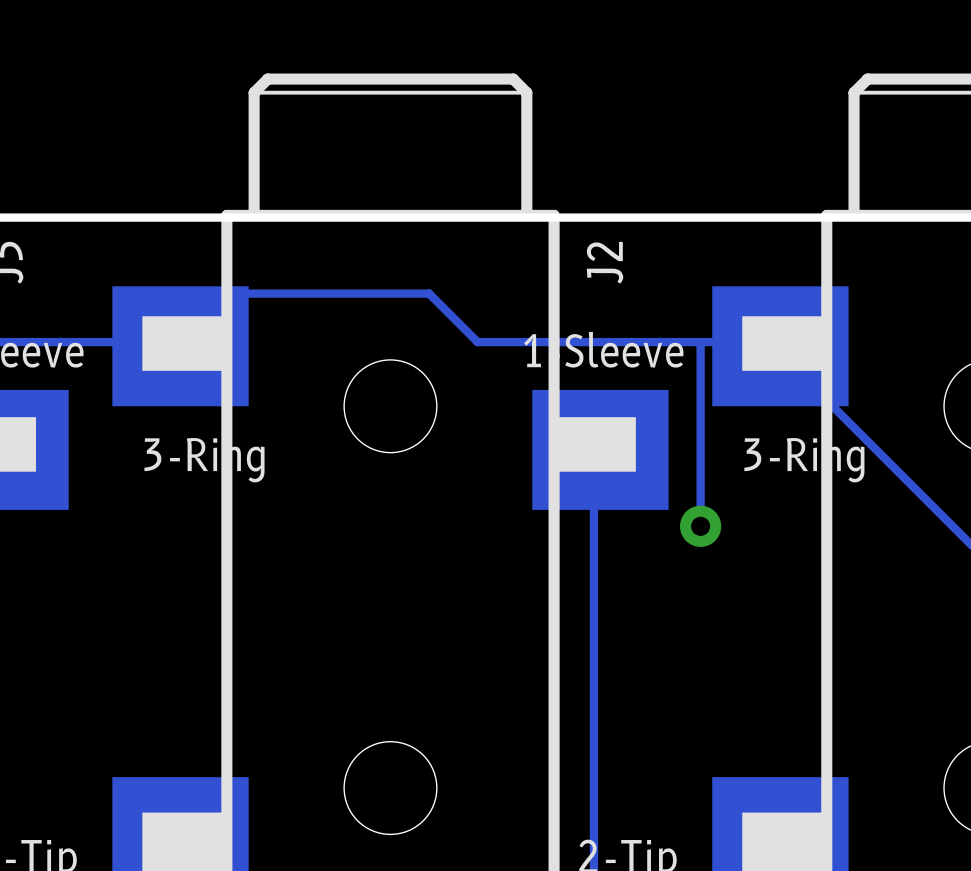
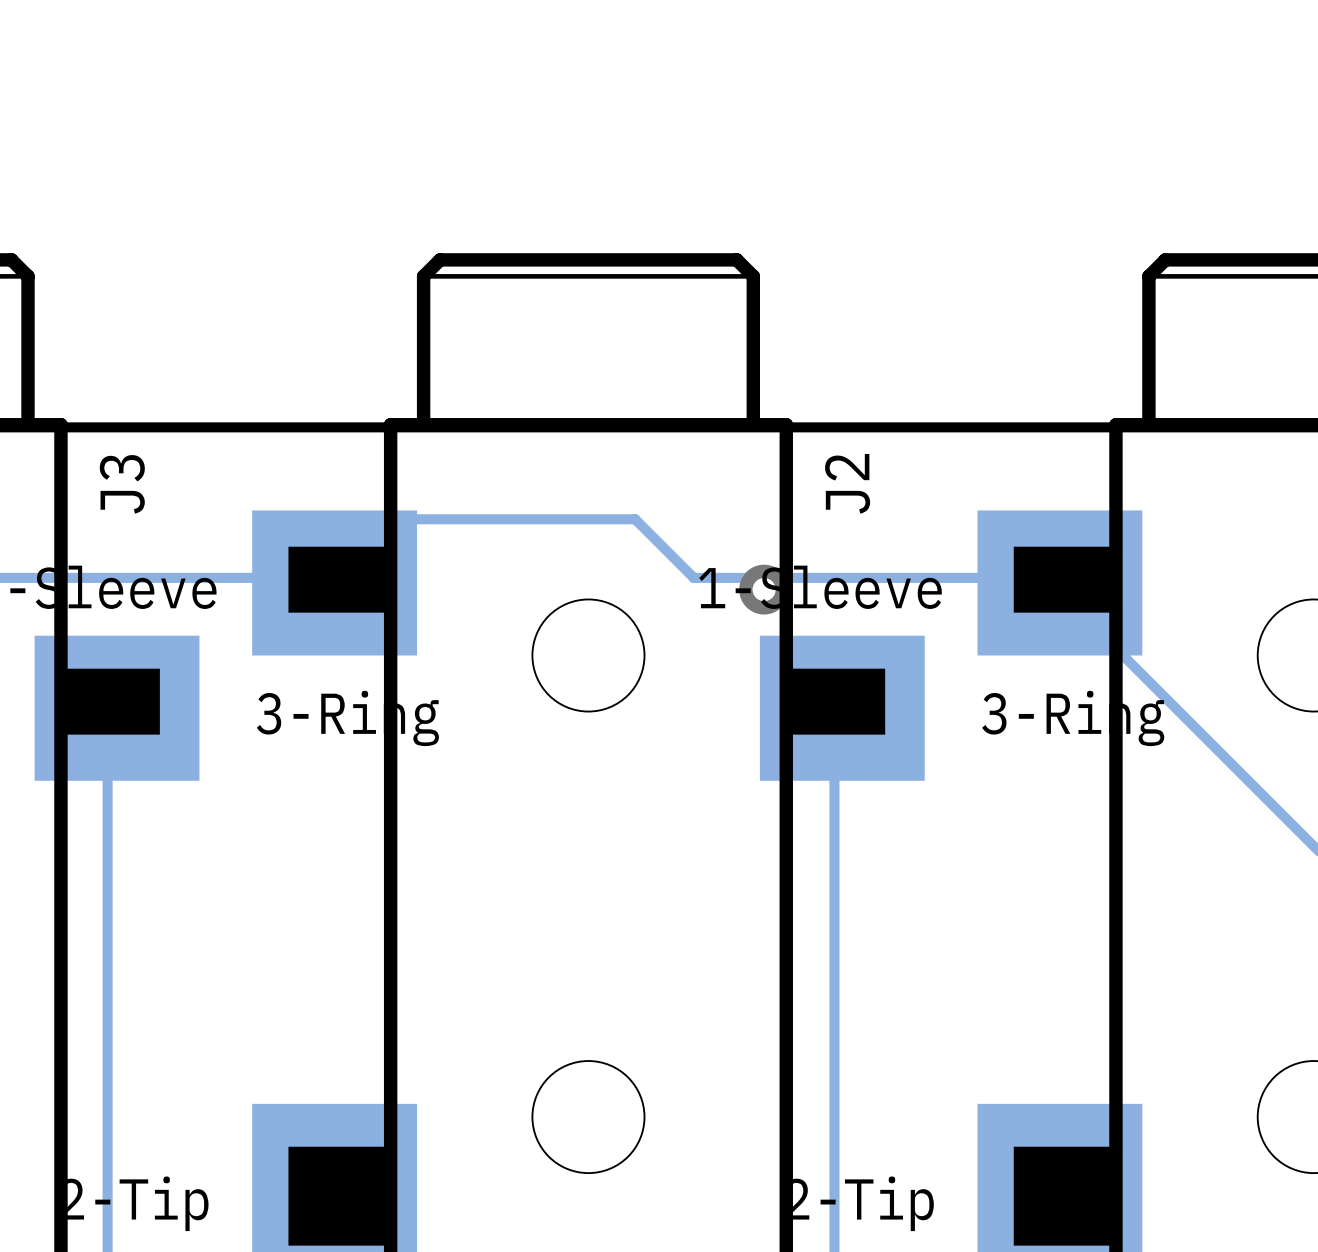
track: (700, 342) (700, 526) -> none
via position: (700, 526) -> (764, 589)

